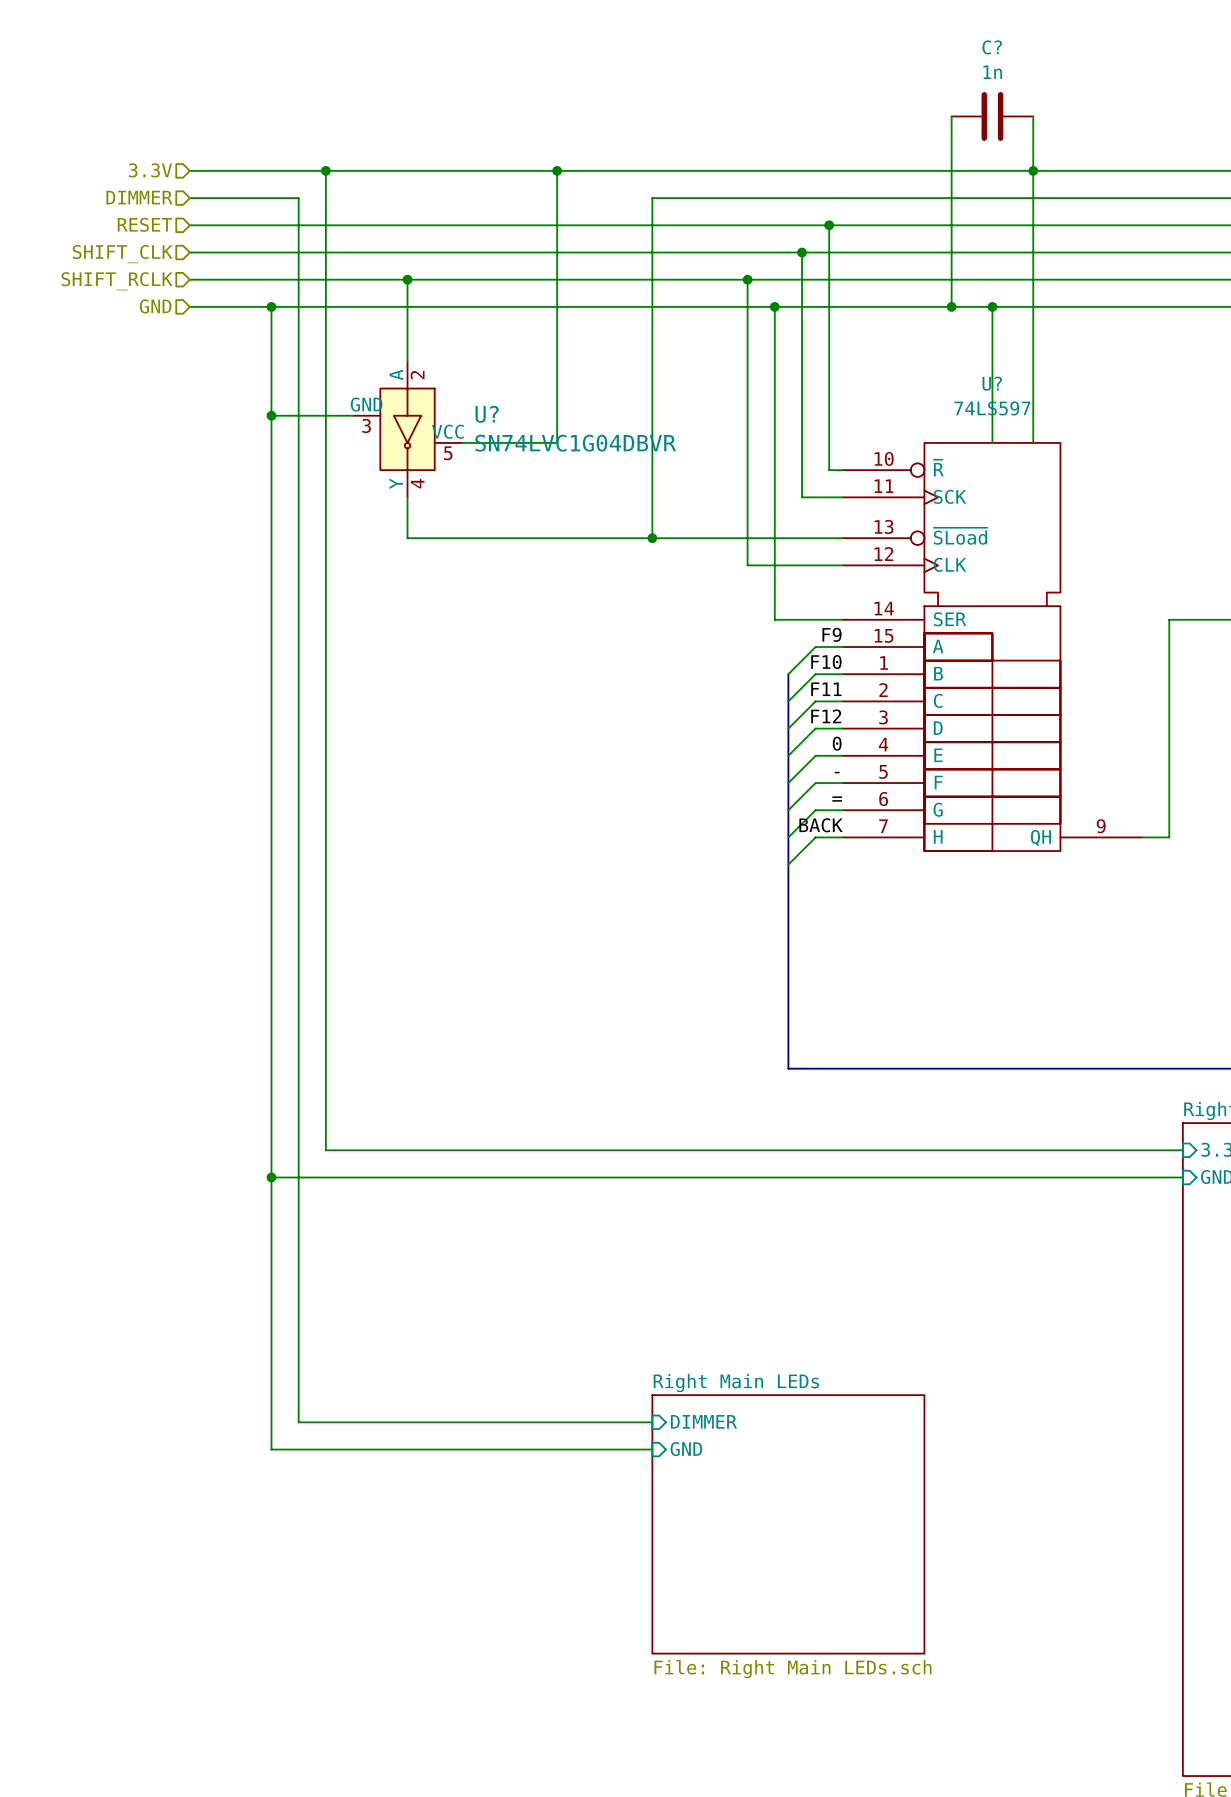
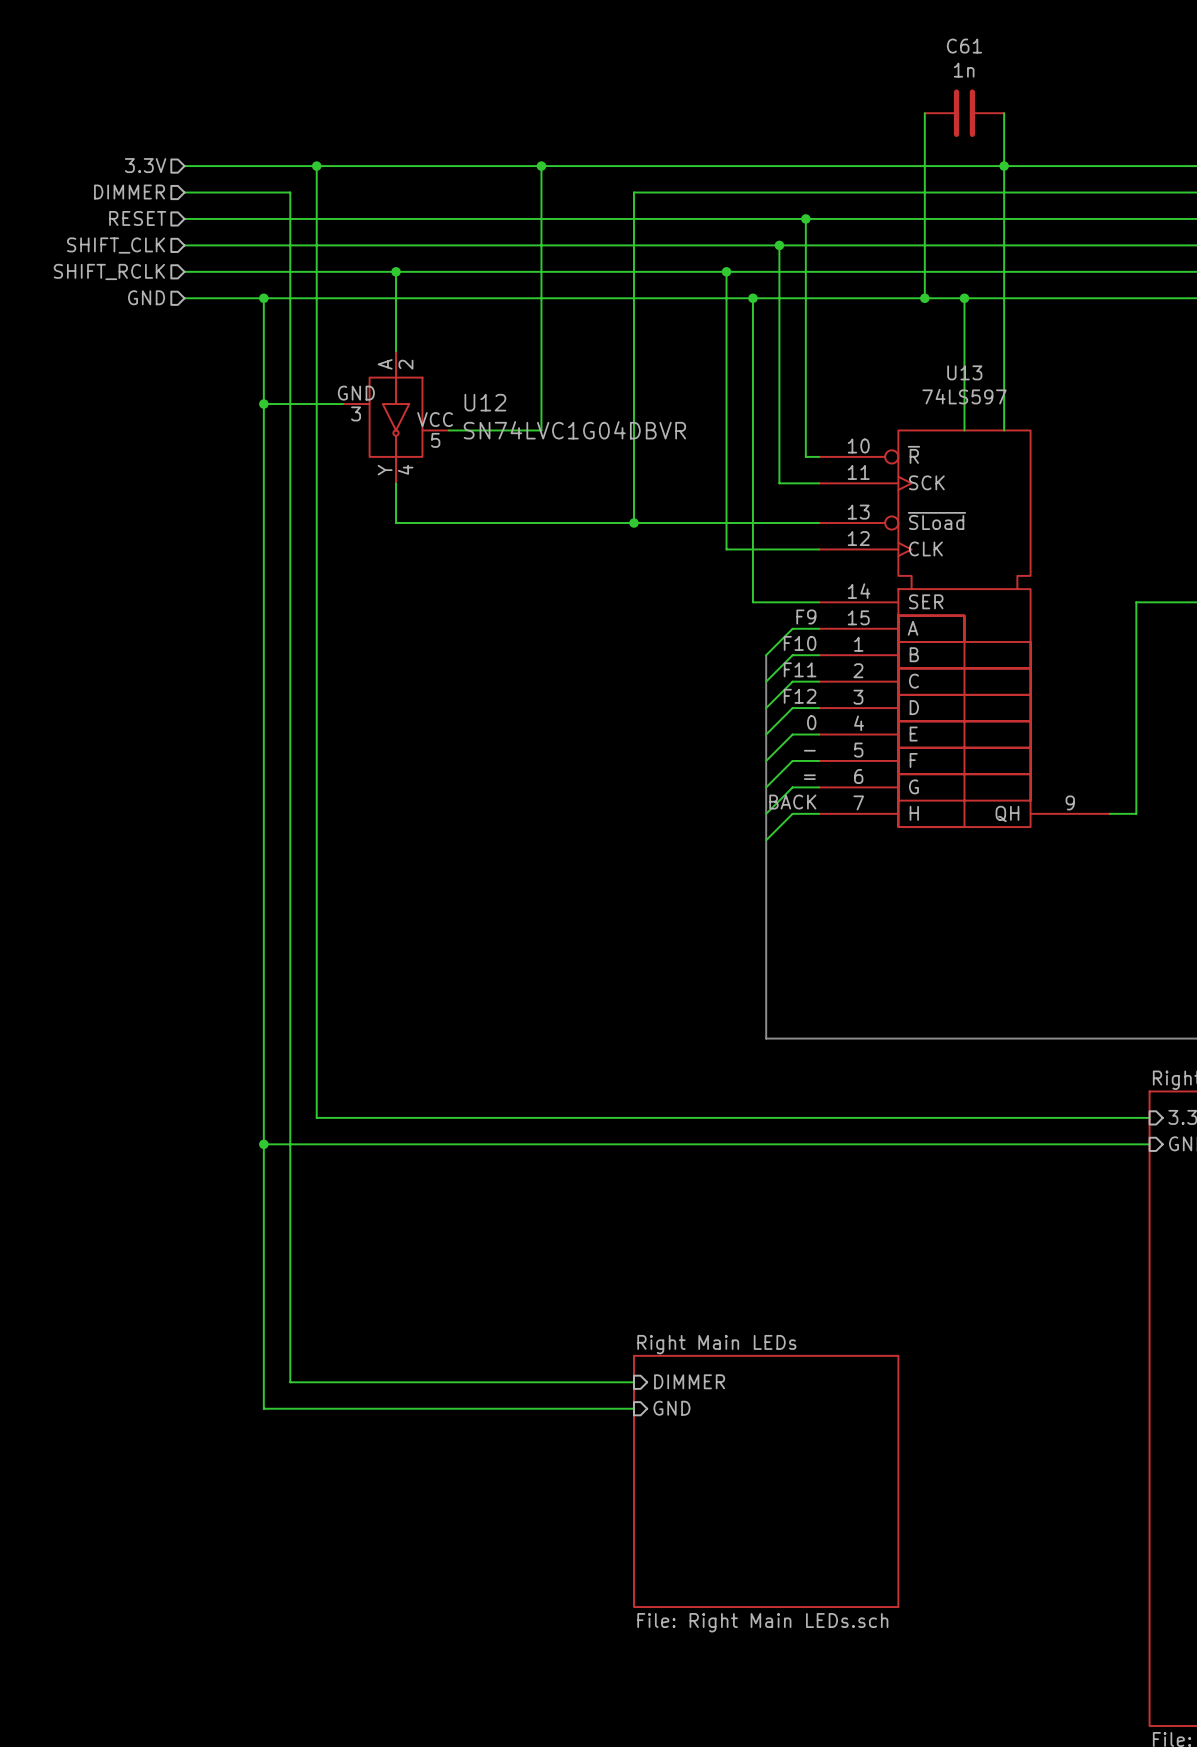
C? name: C? (992, 47) -> C61 (964, 46)
U? name: U? (992, 383) -> U13 (964, 372)
U? name: U? (487, 414) -> U12 (485, 402)

